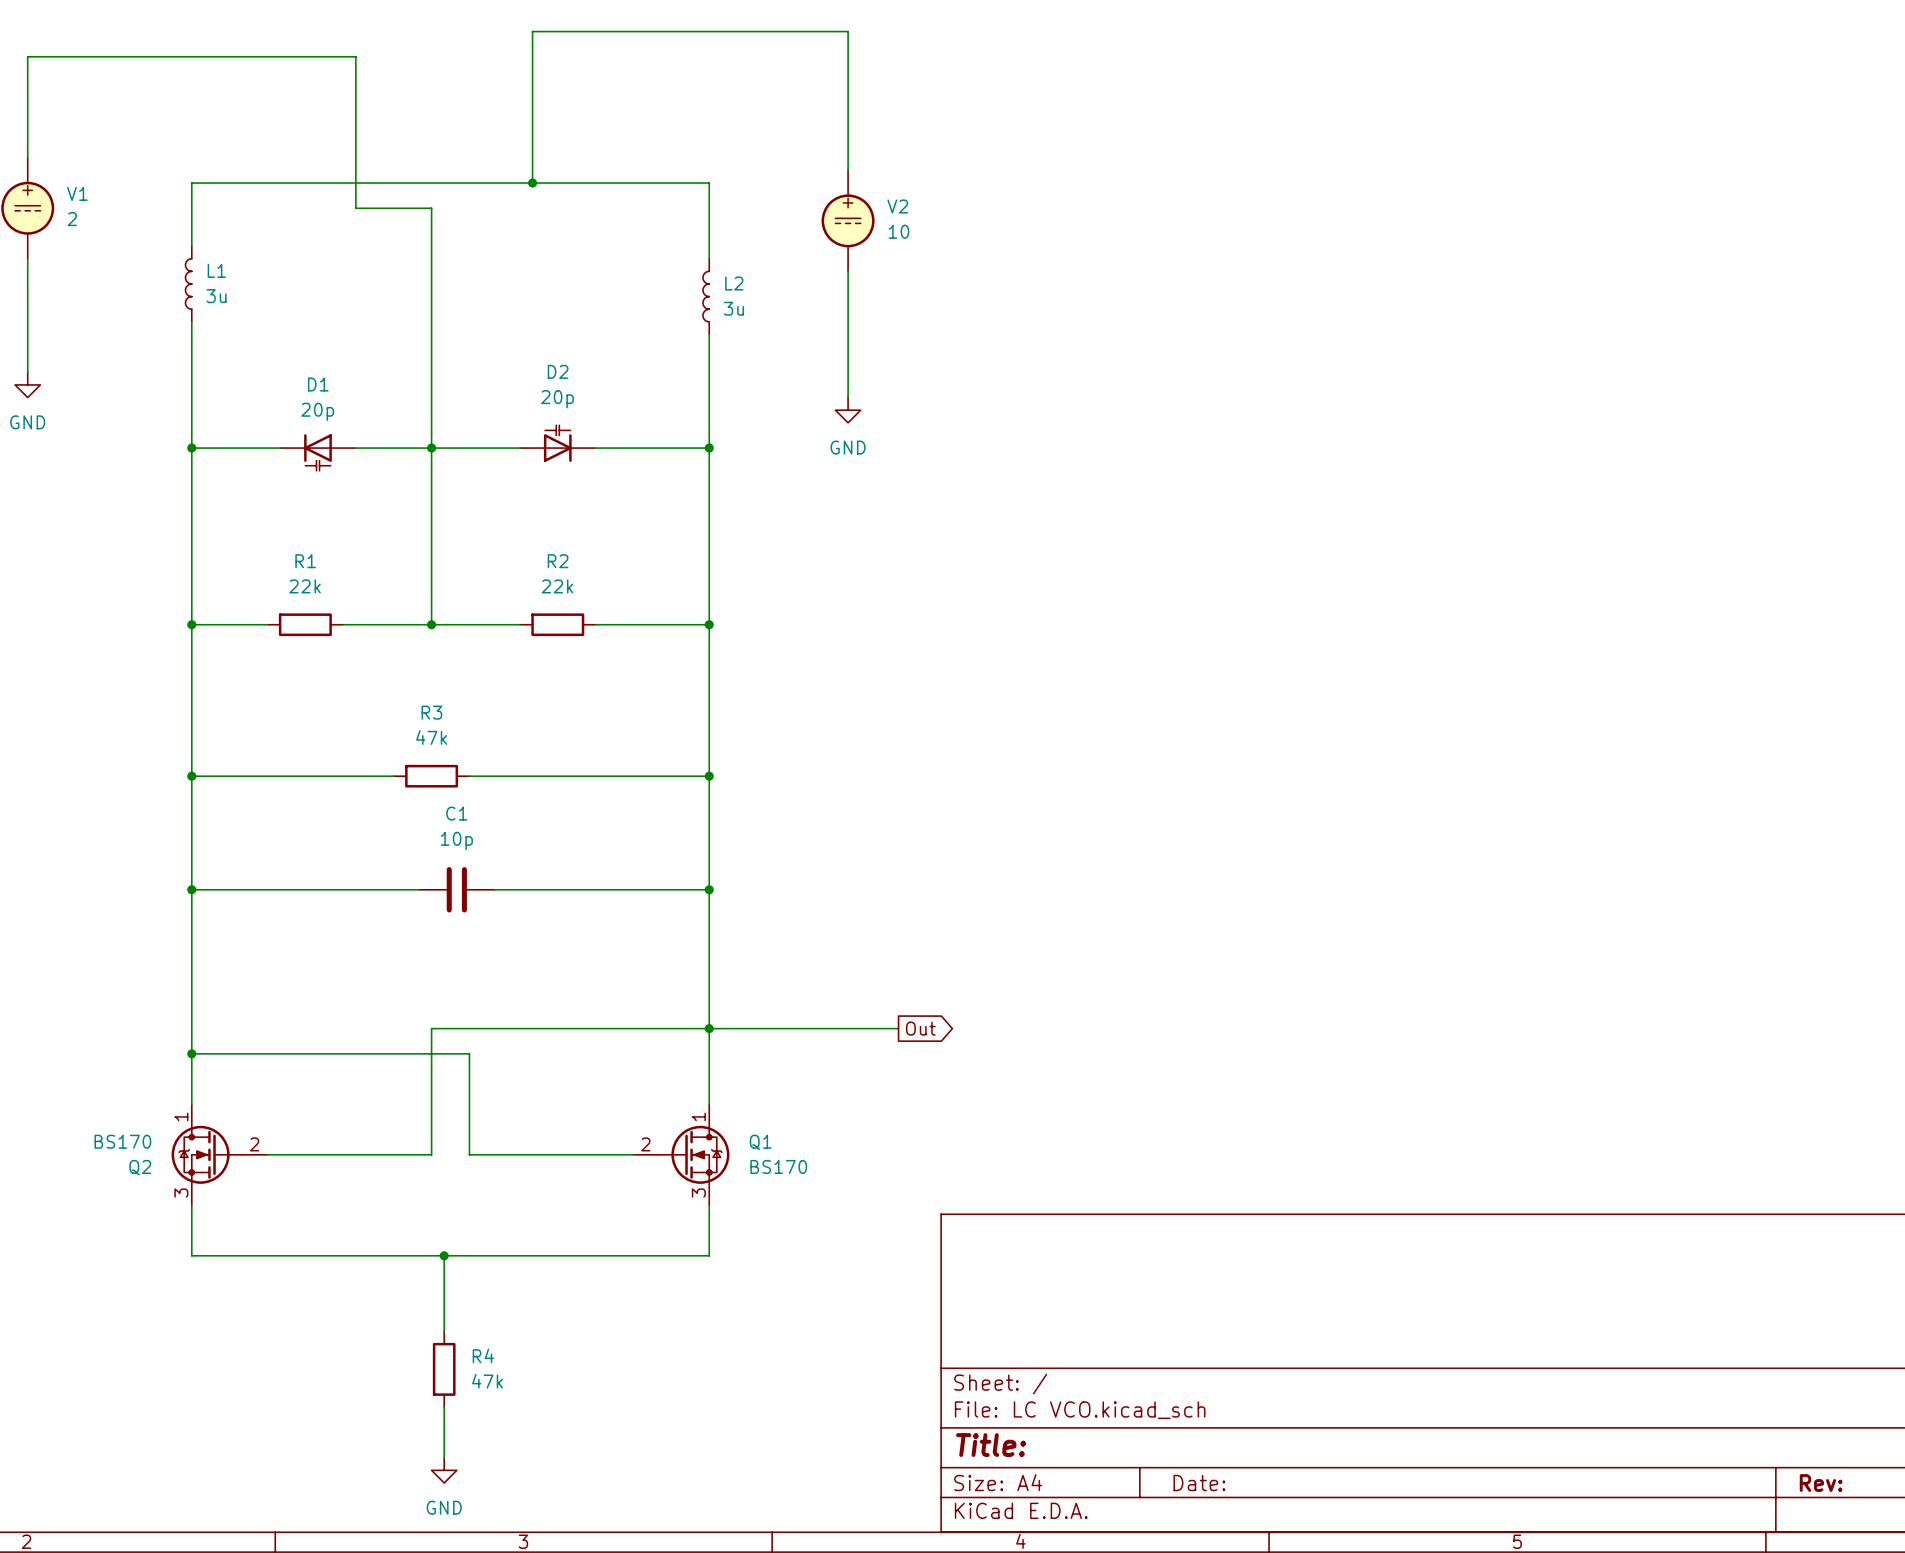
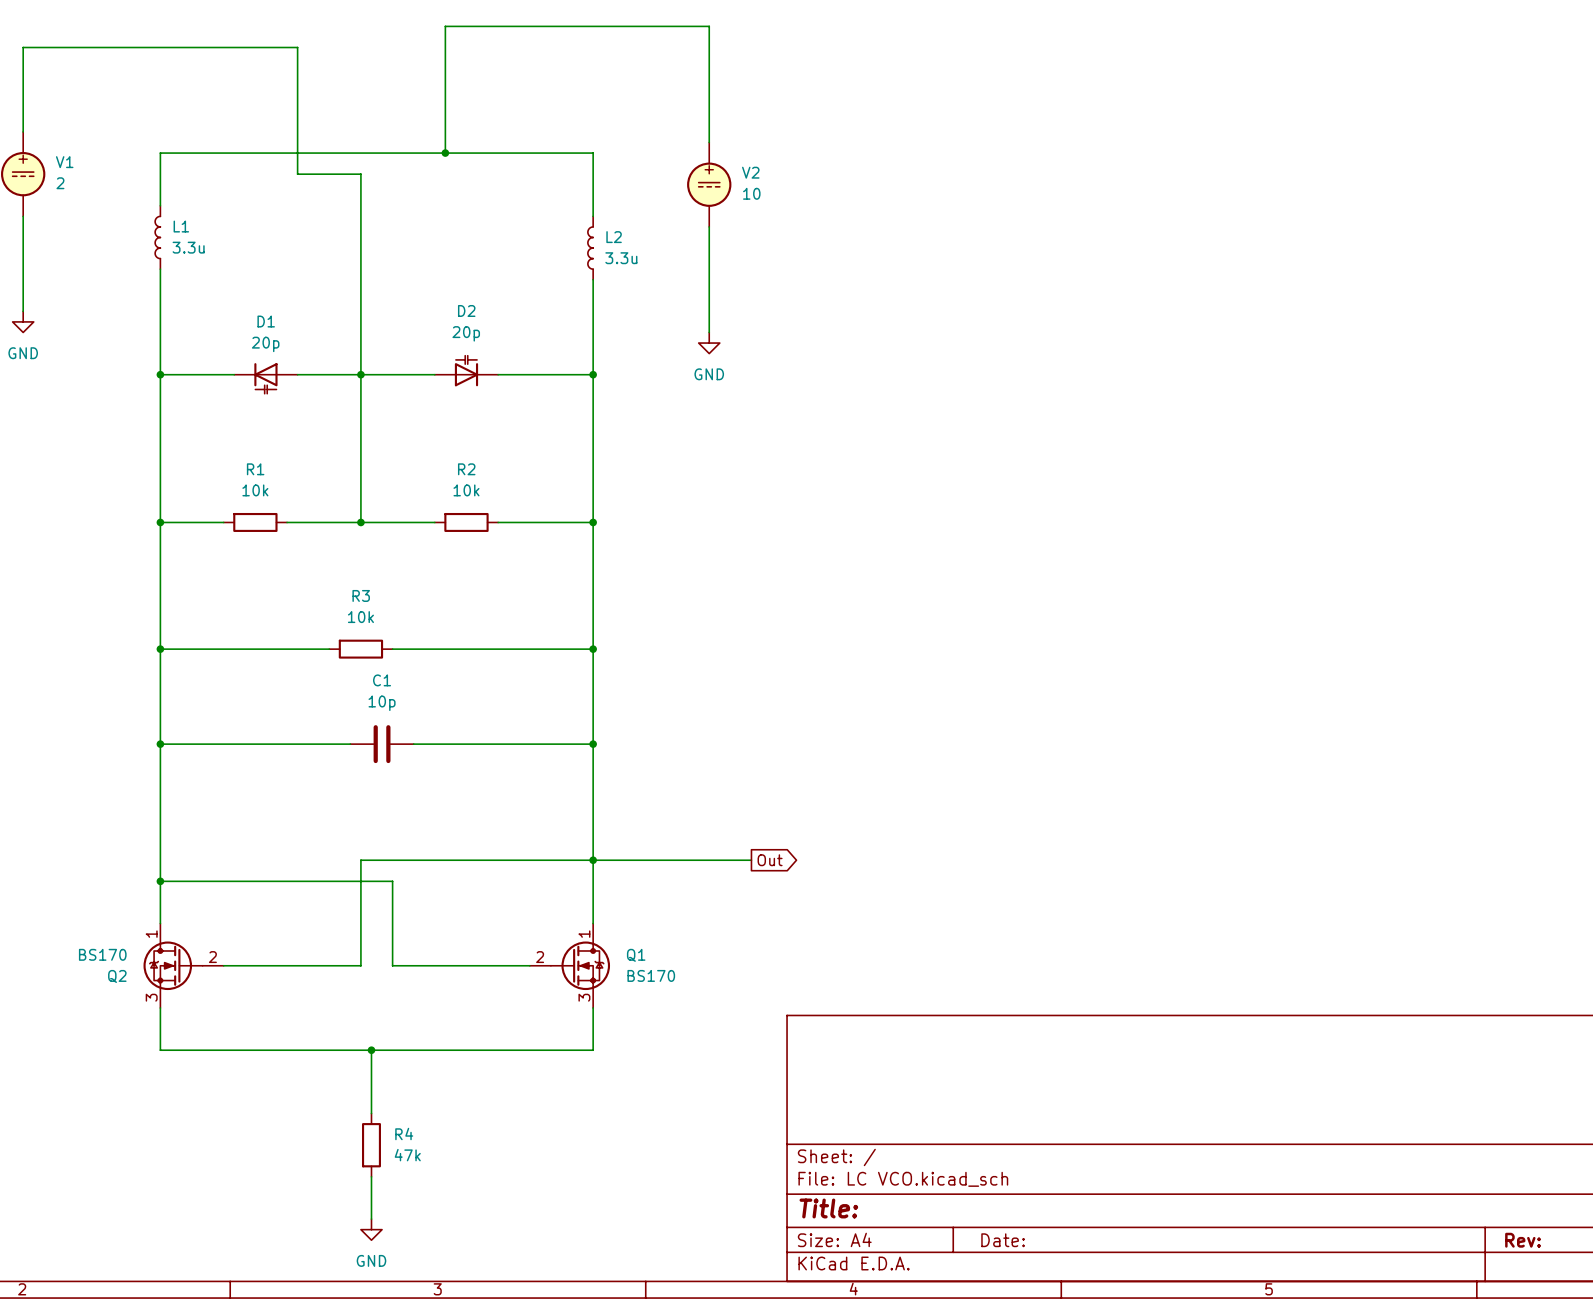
L1 value: 3u (216, 296) -> 3.3u (188, 247)
L2 value: 3u (733, 308) -> 3.3u (621, 258)
R1 value: 22k (305, 586) -> 10k (255, 490)
R2 value: 22k (557, 586) -> 10k (466, 490)
R3 value: 47k (431, 737) -> 10k (360, 617)

